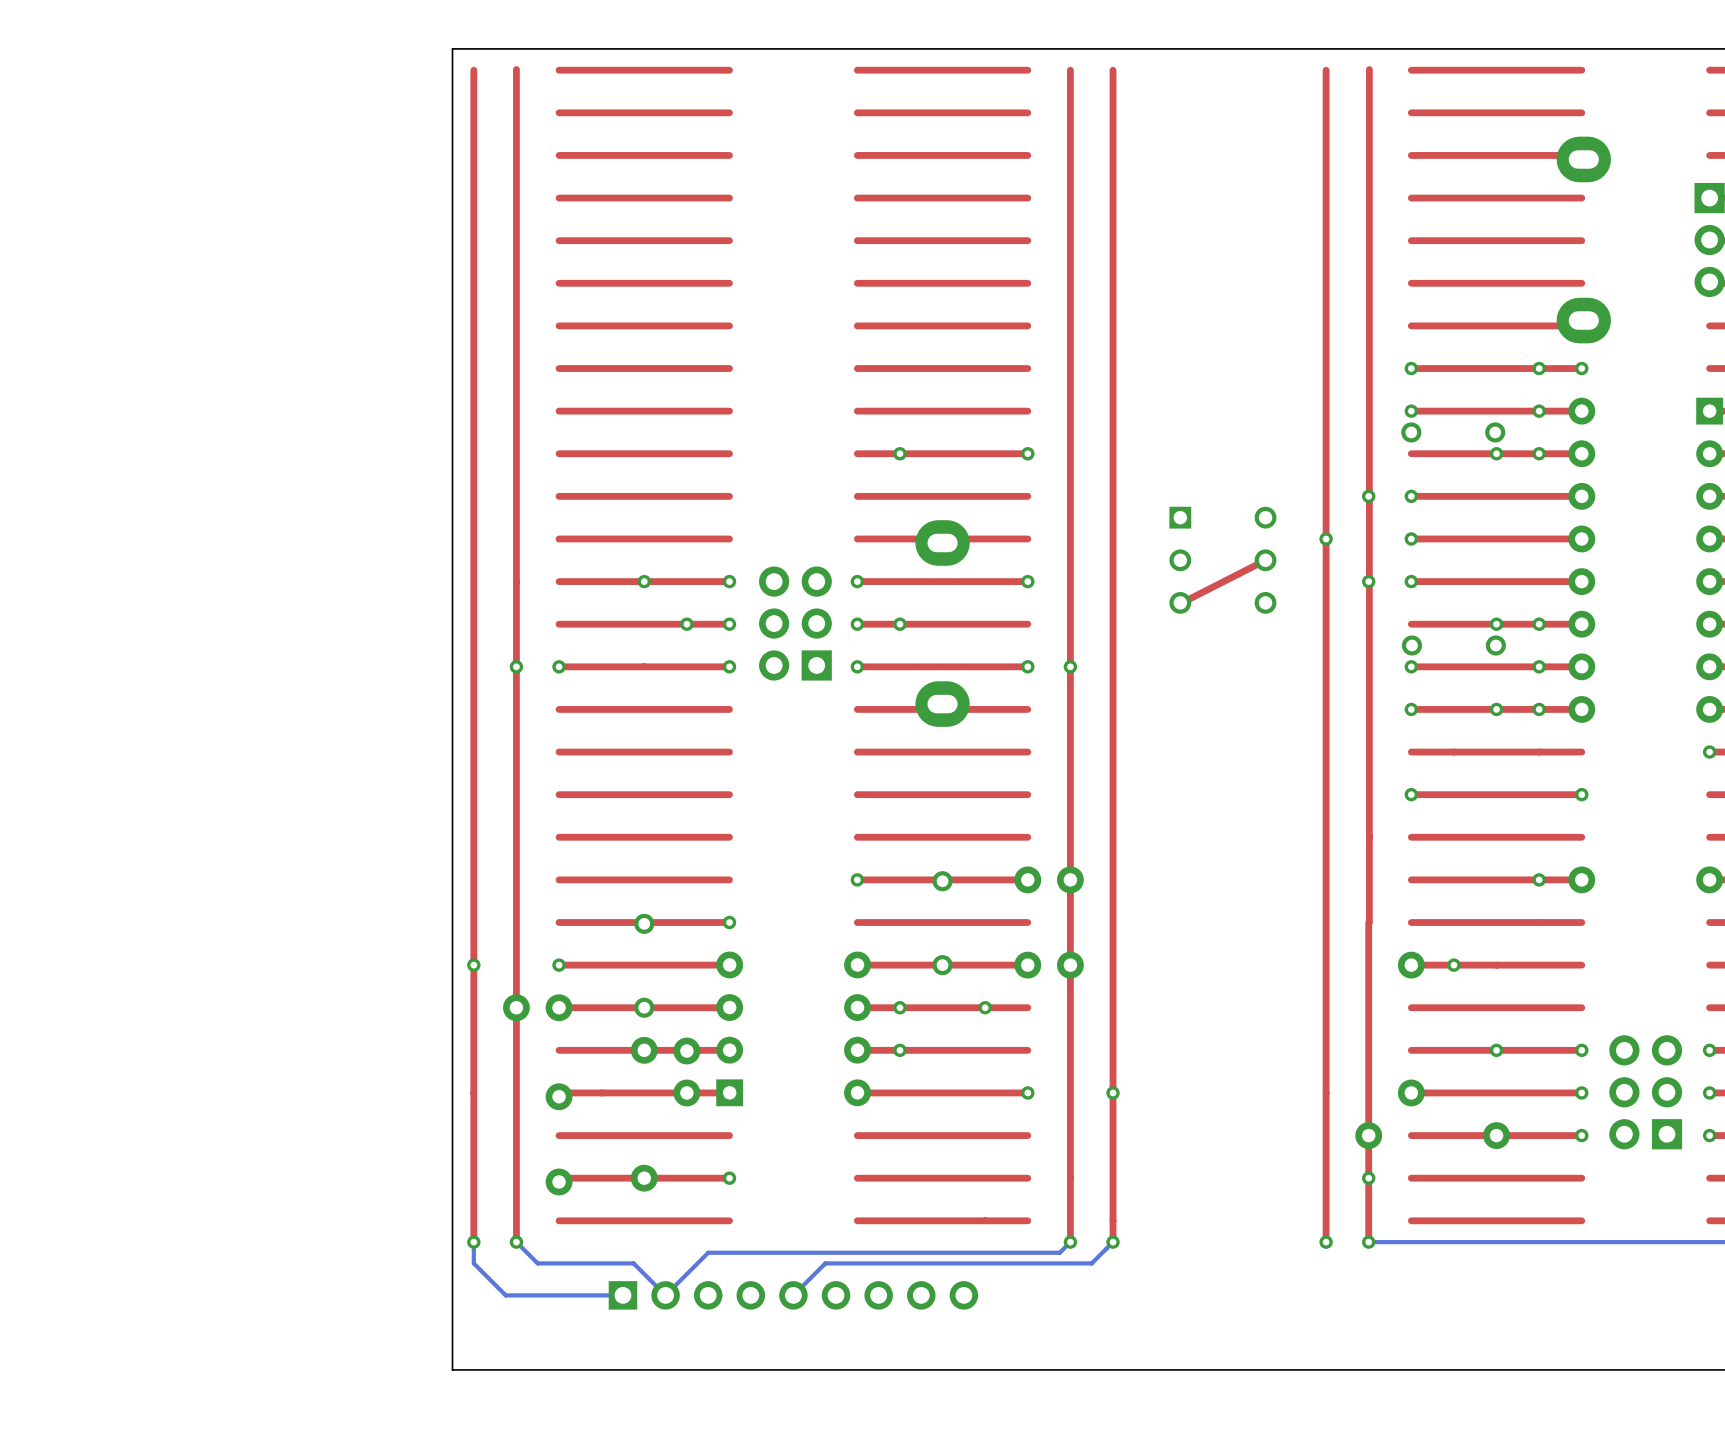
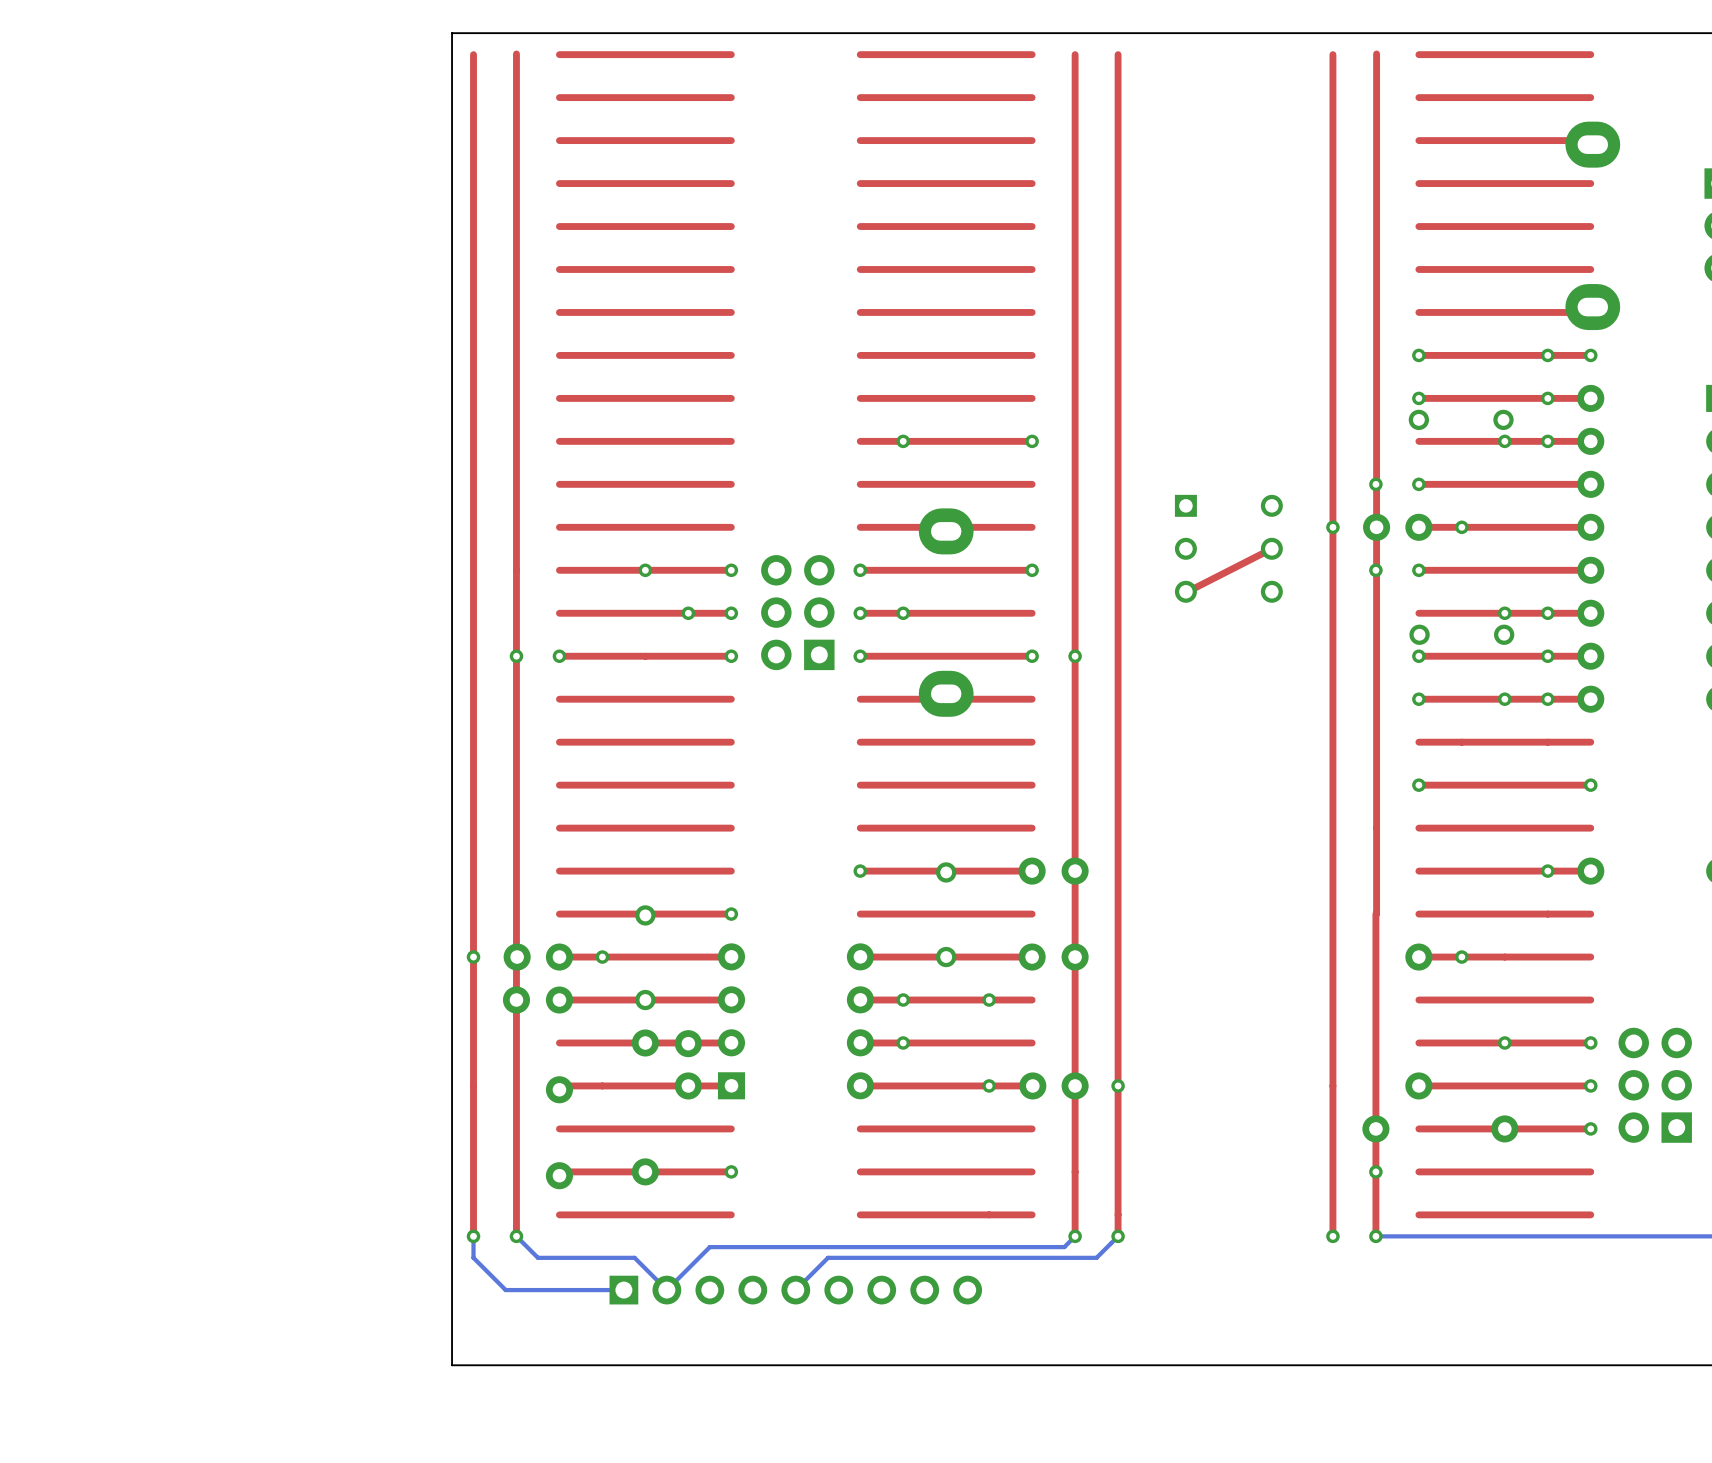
part: none -> (1397, 527)
via position: (1411, 538) -> (1461, 527)
part: none -> (538, 957)
via position: (559, 965) -> (602, 957)
via position: (1027, 1092) -> (989, 1085)
part: none -> (1053, 1085)

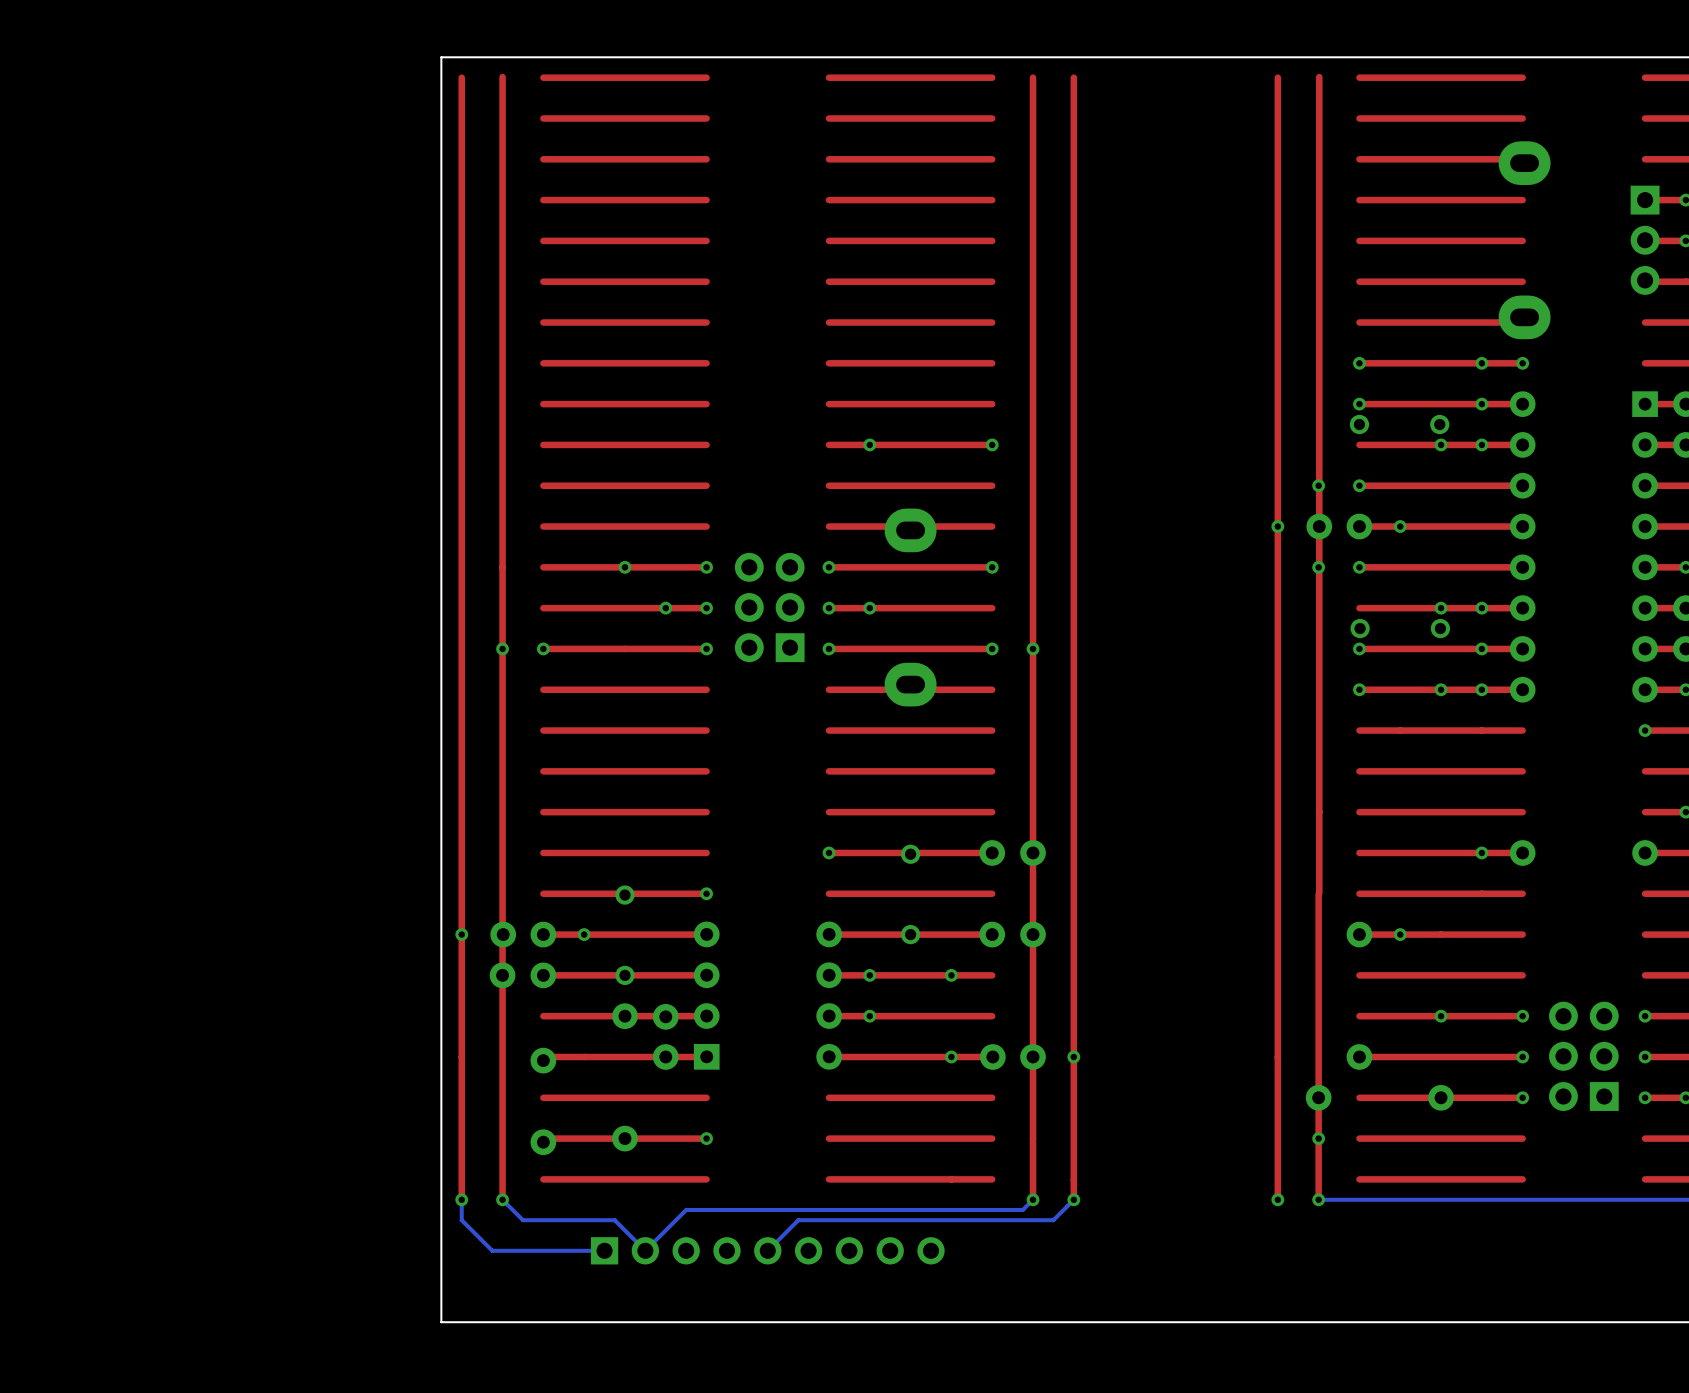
part: (1228, 548) -> none
via: (1418, 785) -> none
via: (1590, 785) -> none

